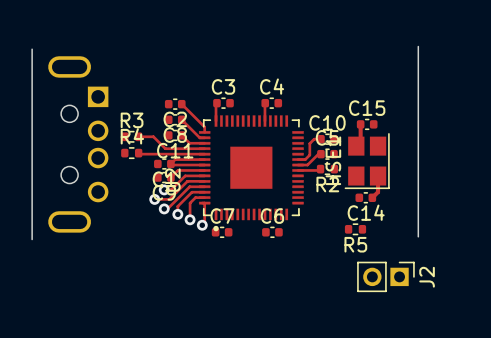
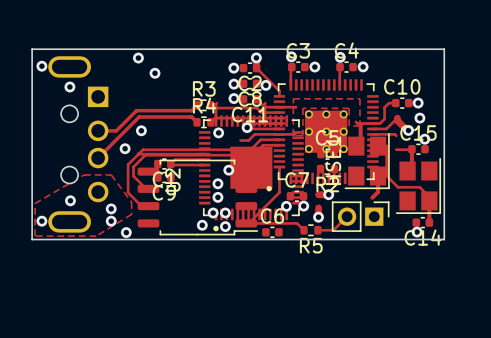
board edge: (418, 46) (418, 236) -> none
board edge: none -> (32, 49) (444, 49) (444, 239) (32, 239)
via: none -> (291, 56)
via: none -> (256, 57)
via: none -> (340, 57)
via: none -> (138, 58)
track: none -> (256, 58) (256, 68) (279, 91) (279, 96)
via: none -> (41, 66)
via: none -> (363, 66)
via: none -> (314, 67)
track: none -> (339, 67) (339, 84)
via: none -> (233, 68)
track: none -> (290, 68) (290, 84)
via: none -> (155, 73)
via: none -> (233, 84)
via: none -> (265, 85)
via: none -> (69, 87)
via: none -> (233, 98)
zone outline: none -> (293, 98) (293, 135) (302, 135) (302, 108) (349, 108) (349, 126) (359, 126) (359, 98) (293, 98)
track: none -> (256, 99) (264, 107) (296, 106)
C3 position: (223, 103) -> (298, 67)
C4 position: (271, 103) -> (346, 67)
track: none -> (395, 103) (389, 103) (384, 107) (384, 119) (380, 123) (355, 121)
via: none -> (418, 103)
C2 position: (175, 104) -> (250, 68)
track: (181, 104) (204, 127) (204, 132) -> none
track: none -> (197, 105) (191, 110) (136, 110) (116, 130) (98, 130)
track: none -> (210, 105) (213, 108) (256, 108) (261, 112) (279, 112)
part: none -> (309, 114)
part: none -> (326, 114)
part: none -> (343, 114)
track: none -> (279, 118) (215, 118) (210, 122)
via: none -> (419, 118)
C8 position: (175, 119) -> (250, 83)
track: (181, 119) (199, 137) (204, 137) -> none
track: none -> (197, 122) (191, 116) (139, 116) (98, 158)
track: none -> (279, 123) (251, 123) (247, 127) (279, 128)
C15 position: (367, 124) -> (418, 149)
via: none -> (247, 127)
track: none -> (372, 128) (386, 128) (397, 118) (397, 120) (408, 130)
via: none -> (141, 130)
via: none -> (408, 130)
part: none -> (309, 131)
part: none -> (326, 131)
part: none -> (343, 131)
via: none -> (218, 132)
track: none -> (296, 132) (294, 134) (254, 134) (248, 140) (240, 140)
track: none -> (372, 134) (396, 135)
C11 position: (175, 135) -> (250, 99)
track: (181, 135) (189, 143) (204, 143) -> none
part: none -> (322, 135)
R3 position: (131, 136) -> (203, 105)
track: (138, 136) (153, 136) (165, 148) (204, 148) -> none
track: none -> (279, 139) (260, 139) (250, 149) (143, 149) (128, 164) (128, 192) (141, 206) (148, 206)
track: (320, 139) (314, 139) (309, 143) (309, 155) (305, 159) (298, 159) -> none
C10 position: (327, 139) -> (402, 103)
track: none -> (372, 139) (380, 139) (386, 146) (386, 175) (398, 187) (419, 187) (429, 196) (429, 222)
via: none -> (424, 139)
track: none -> (279, 145) (262, 145) (252, 155) (145, 155) (133, 166) (133, 176) (148, 188)
via: none -> (125, 148)
part: none -> (309, 149)
part: none -> (326, 149)
part: none -> (343, 149)
track: none -> (396, 149) (411, 149) (411, 166) (407, 170) (404, 168)
R4 position: (131, 153) -> (203, 122)
track: (320, 154) (318, 154) (307, 165) (298, 165) -> none
track: none -> (279, 167) (279, 192) (248, 223)
track: (320, 169) (298, 170) -> none
track: (204, 170) (177, 170) (170, 177) -> none
via: none -> (228, 170)
zone outline: none -> (84, 174) (35, 203) (35, 236) (96, 236) (131, 214) (131, 202) (111, 174) (84, 174)
track: (204, 175) (185, 175) (171, 189) (164, 189) -> none
track: (204, 181) (187, 181) (169, 199) (154, 199) -> none
via: none -> (217, 183)
part: none -> (418, 185)
track: (204, 186) (189, 186) (167, 208) (164, 208) -> none
via: (164, 189) -> none
track: (204, 192) (191, 192) (177, 206) (177, 214) -> none
track: none -> (318, 194) (328, 194)
via: none -> (328, 194)
part: none -> (197, 197)
track: (204, 197) (195, 197) (190, 203) (190, 219) -> none
via: none -> (217, 197)
C14 position: (365, 197) -> (422, 222)
via: (154, 199) -> none
via: none -> (70, 200)
track: (202, 203) (204, 203) (204, 222) (202, 225) -> none
via: none -> (286, 206)
via: none -> (303, 206)
track: none -> (318, 207) (318, 217)
via: none -> (111, 208)
via: (164, 208) -> none
via: none -> (213, 213)
via: none -> (225, 213)
via: (177, 214) -> none
track: none -> (347, 216) (333, 230) (317, 230)
part: none -> (360, 216)
via: none -> (318, 217)
via: (190, 219) -> none
via: none -> (41, 221)
via: none -> (111, 221)
track: none -> (246, 223) (297, 223) (303, 230)
via: none -> (225, 226)
R5 position: (355, 229) -> (310, 230)
via: none -> (126, 232)
C7 position: (222, 232) -> (296, 196)
via: none -> (417, 232)
J2: (385, 276) -> none

